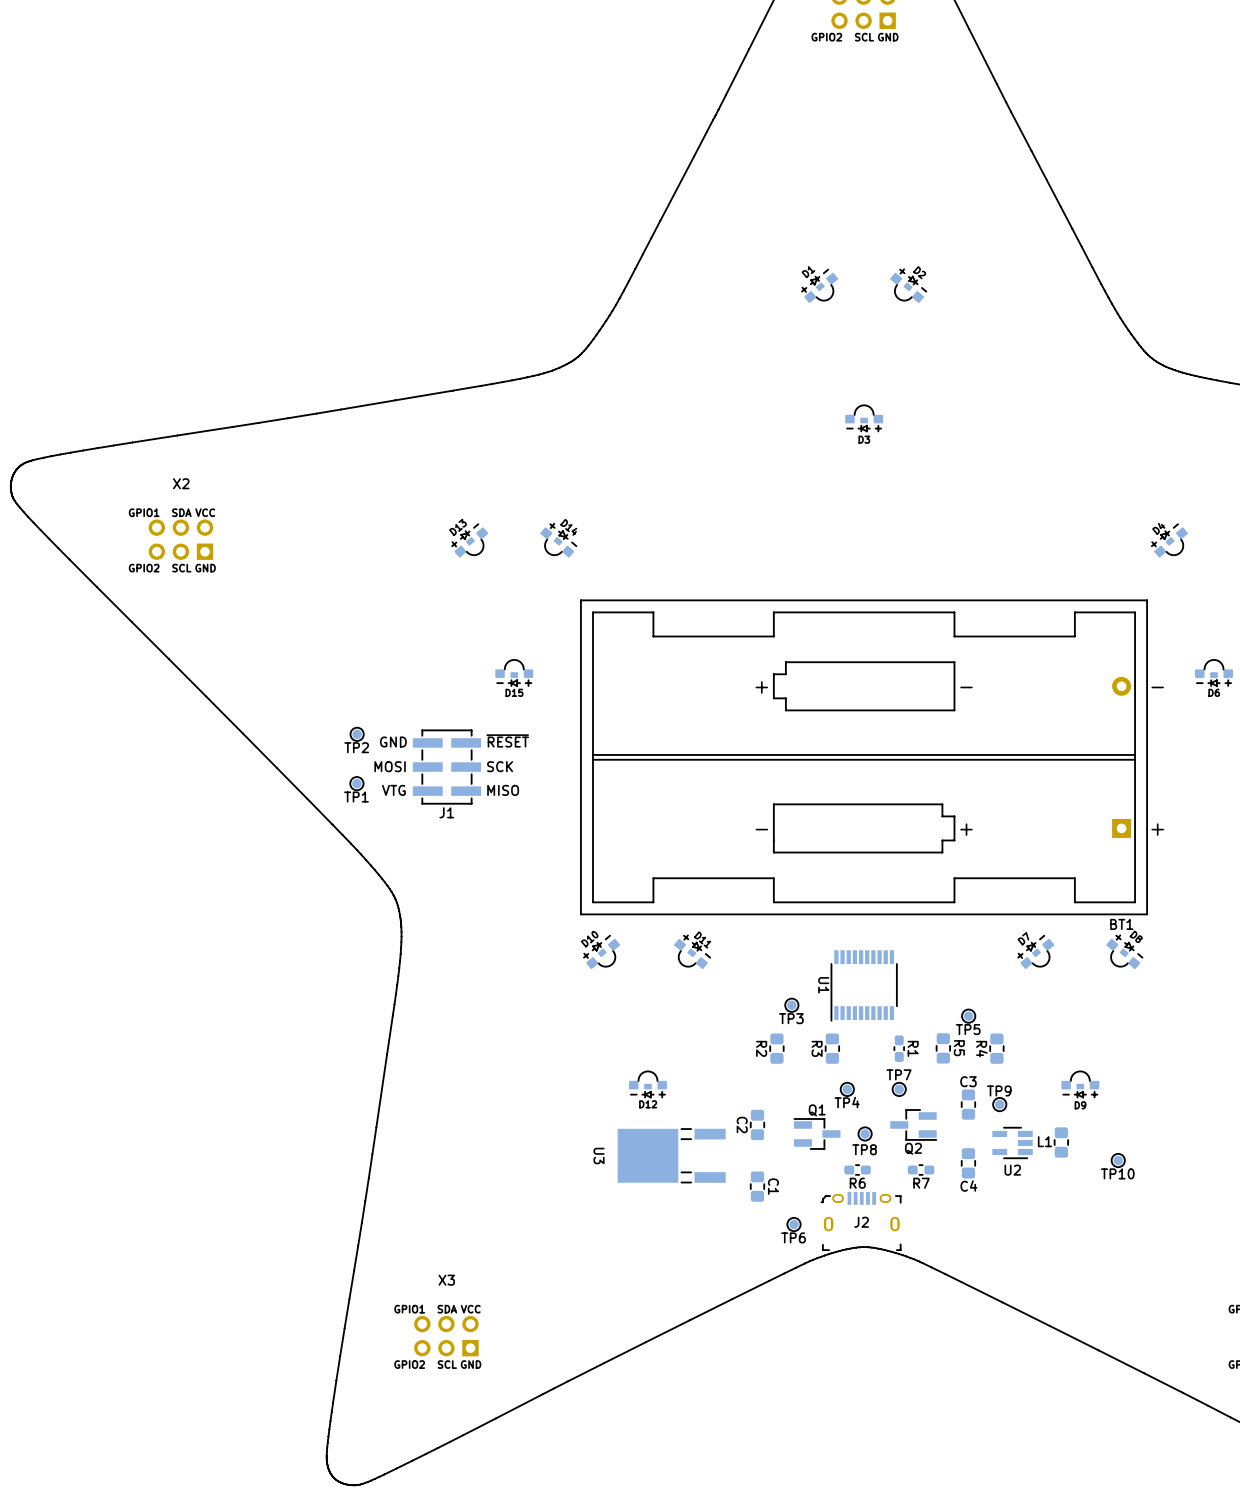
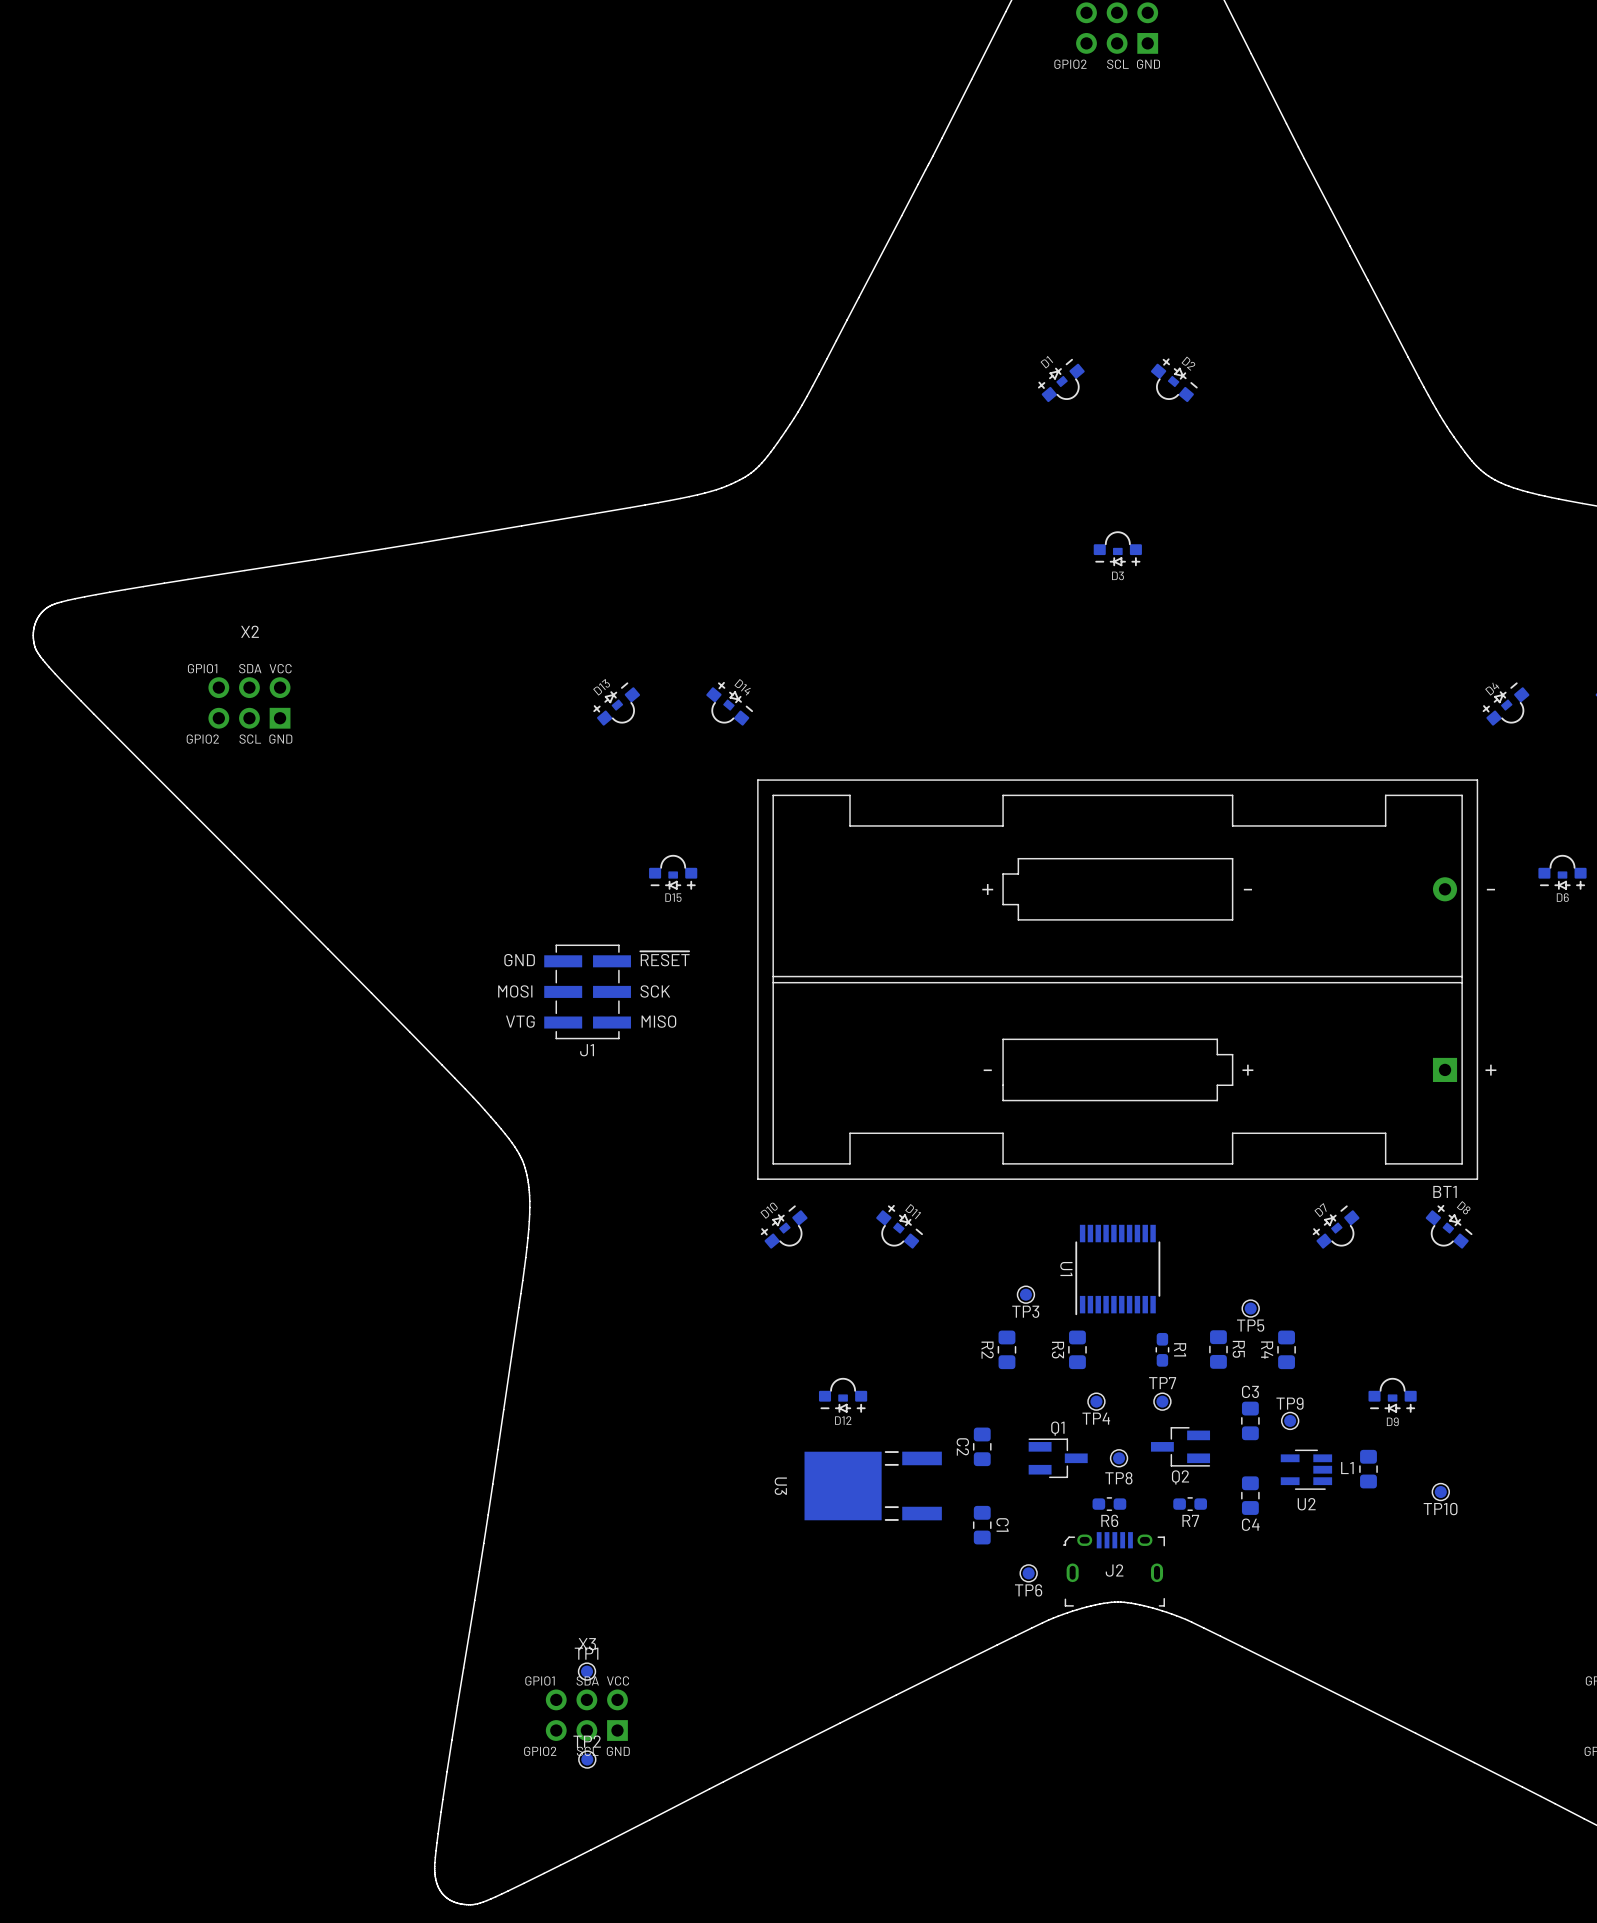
TP2 position: (357, 734) -> (587, 1759)
TP2 name position: TP2 (356, 747) -> TP2 (587, 1741)
TP1 position: (356, 783) -> (586, 1671)
TP1 name position: TP1 (356, 797) -> TP1 (586, 1653)

